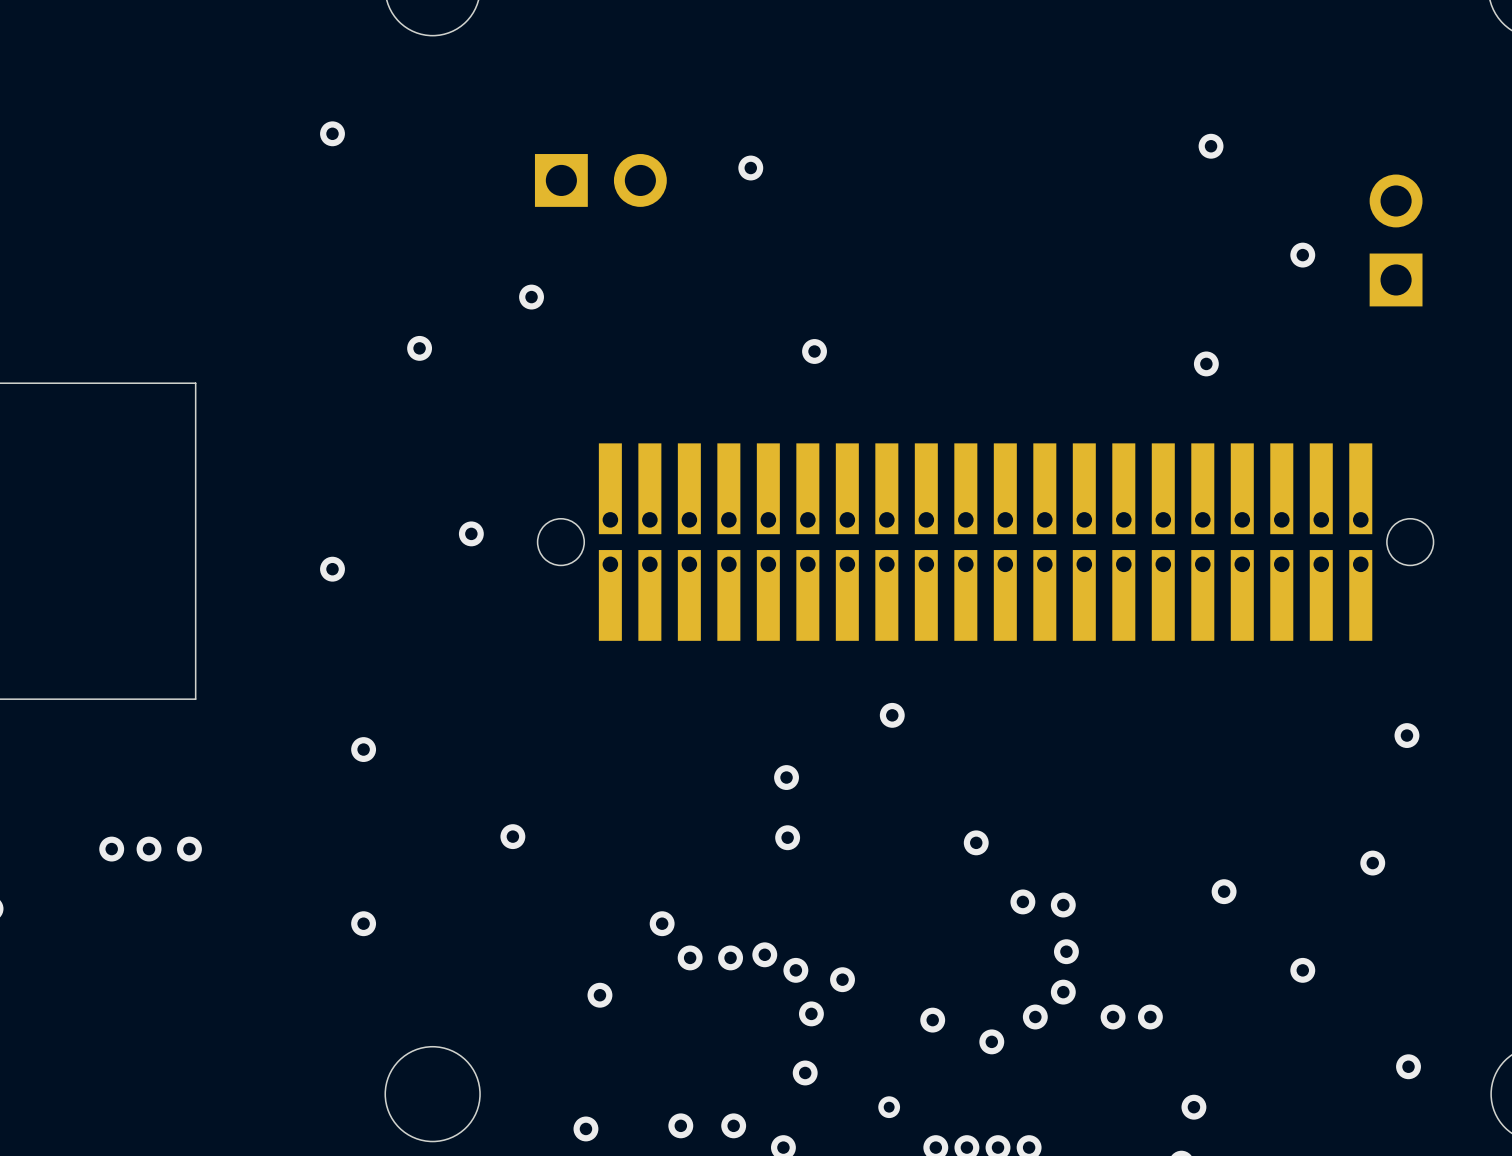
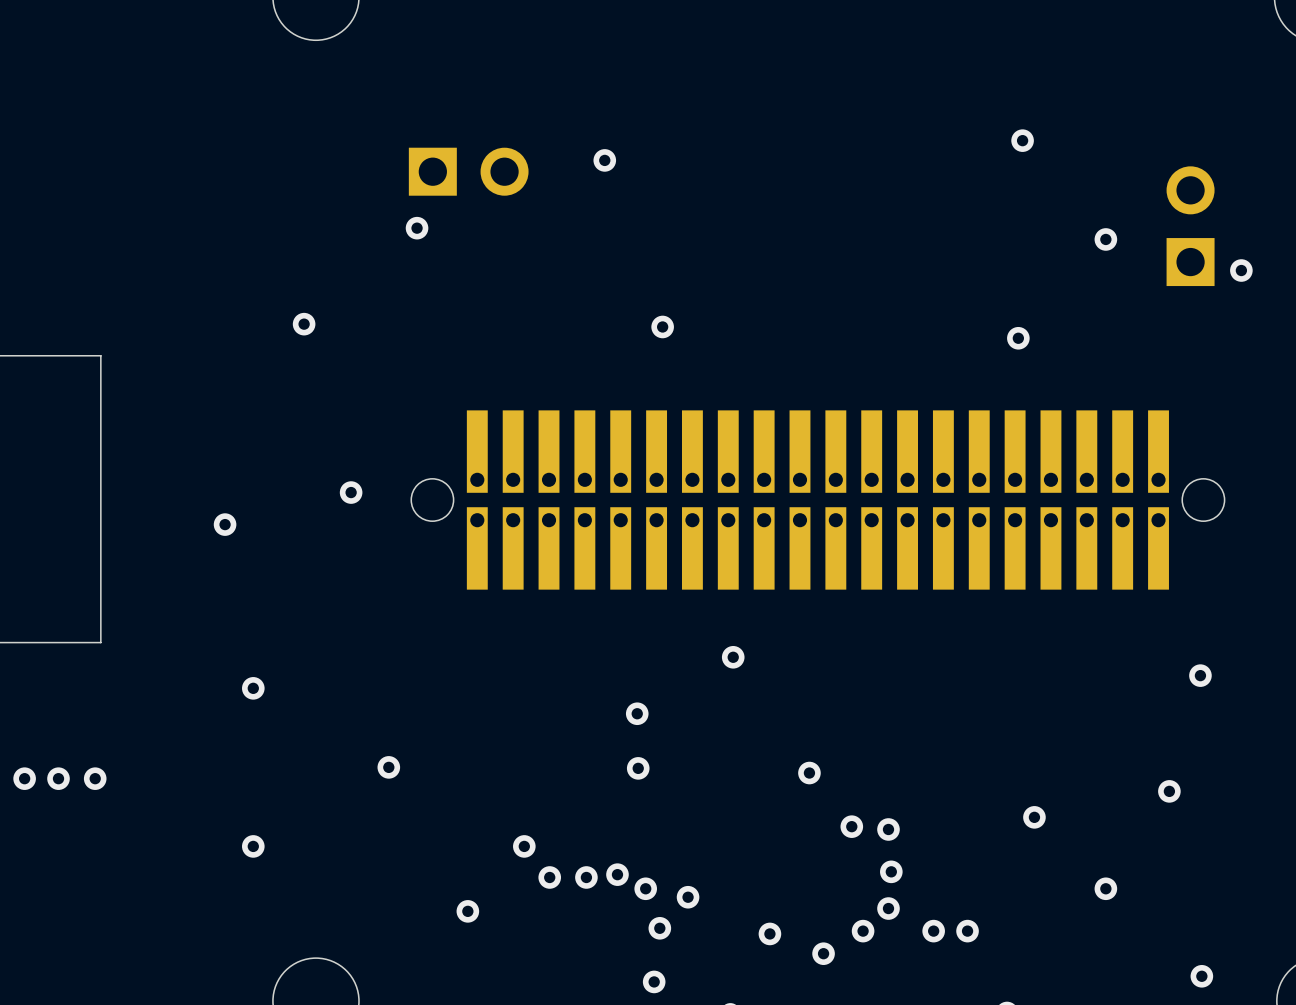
via: (332, 133) -> none
via: none -> (1241, 270)
via position: (531, 297) -> (417, 228)

